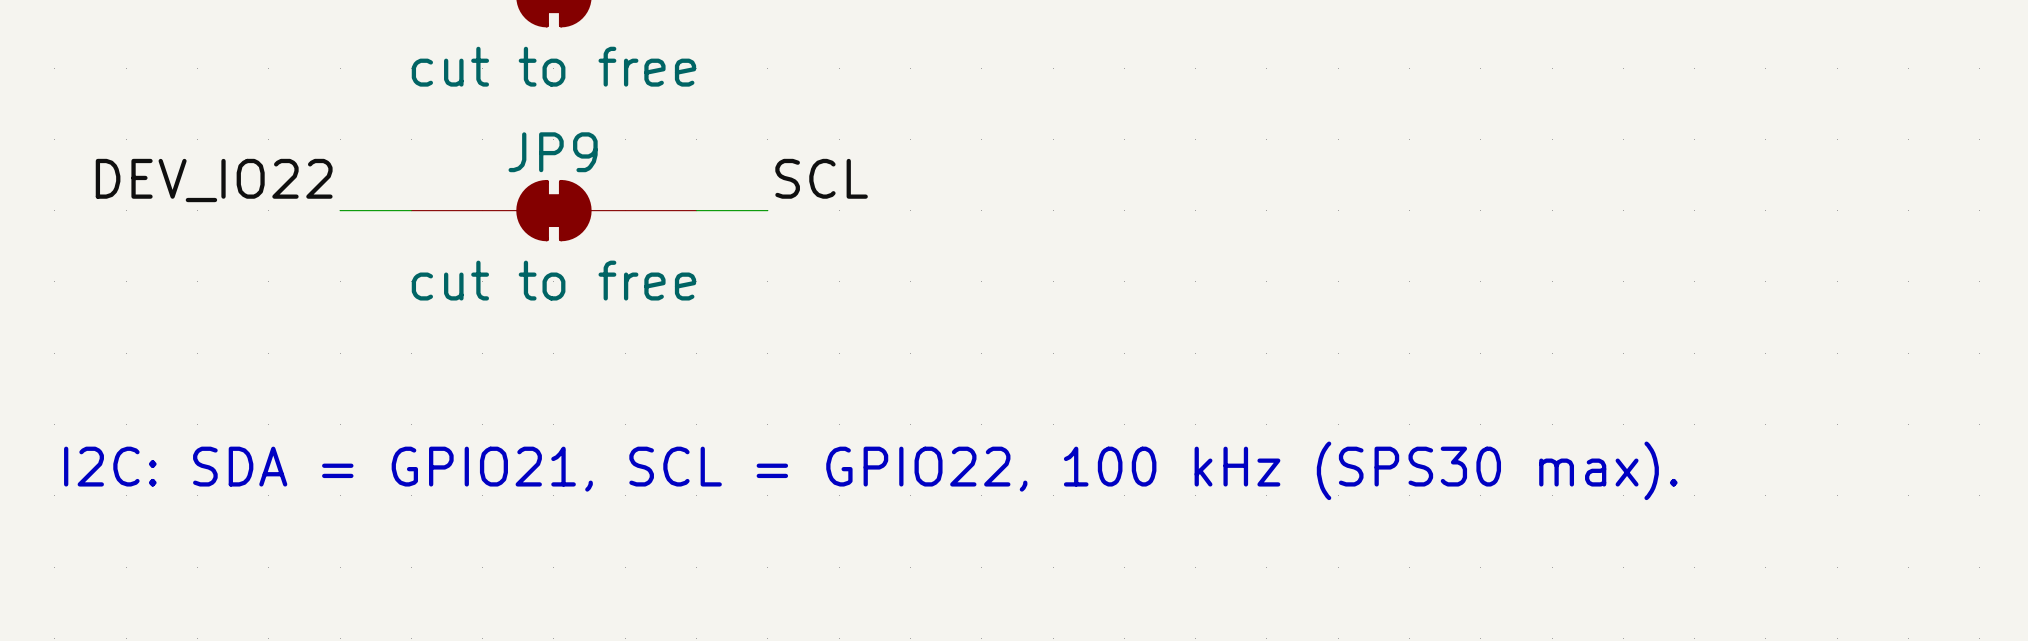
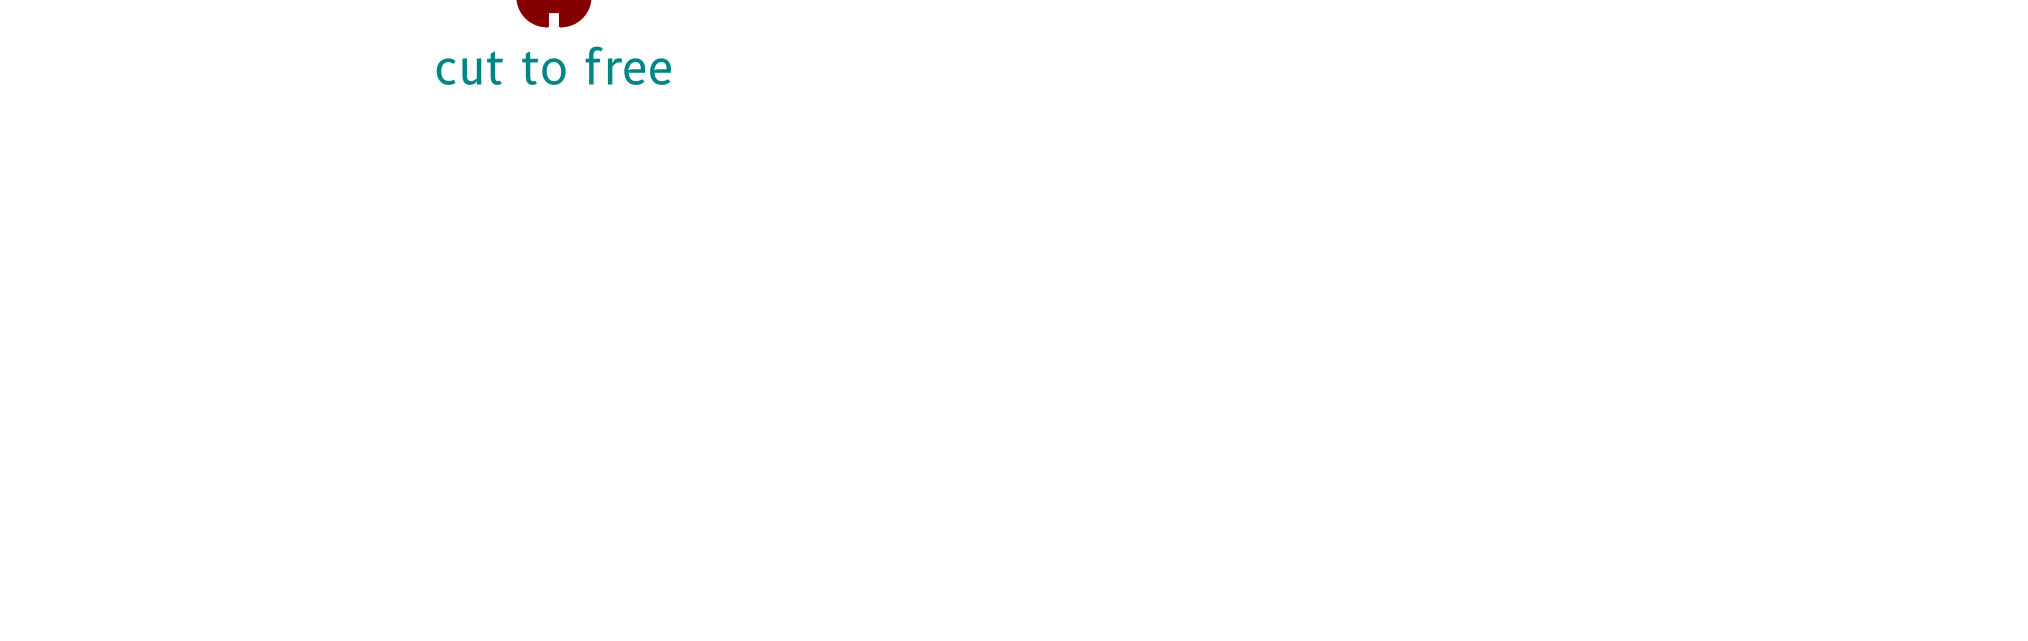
label: SCL (821, 178) -> none
label: DEV_IO22 (214, 180) -> none
wire: (340, 210) (411, 210) -> none
JP9: cut to free (553, 210) -> none
wire: (696, 210) (767, 210) -> none
text: I2C: SDA = GPIO21, SCL = GPIO22, 100 kHz (SPS30 max). (870, 470) -> none

